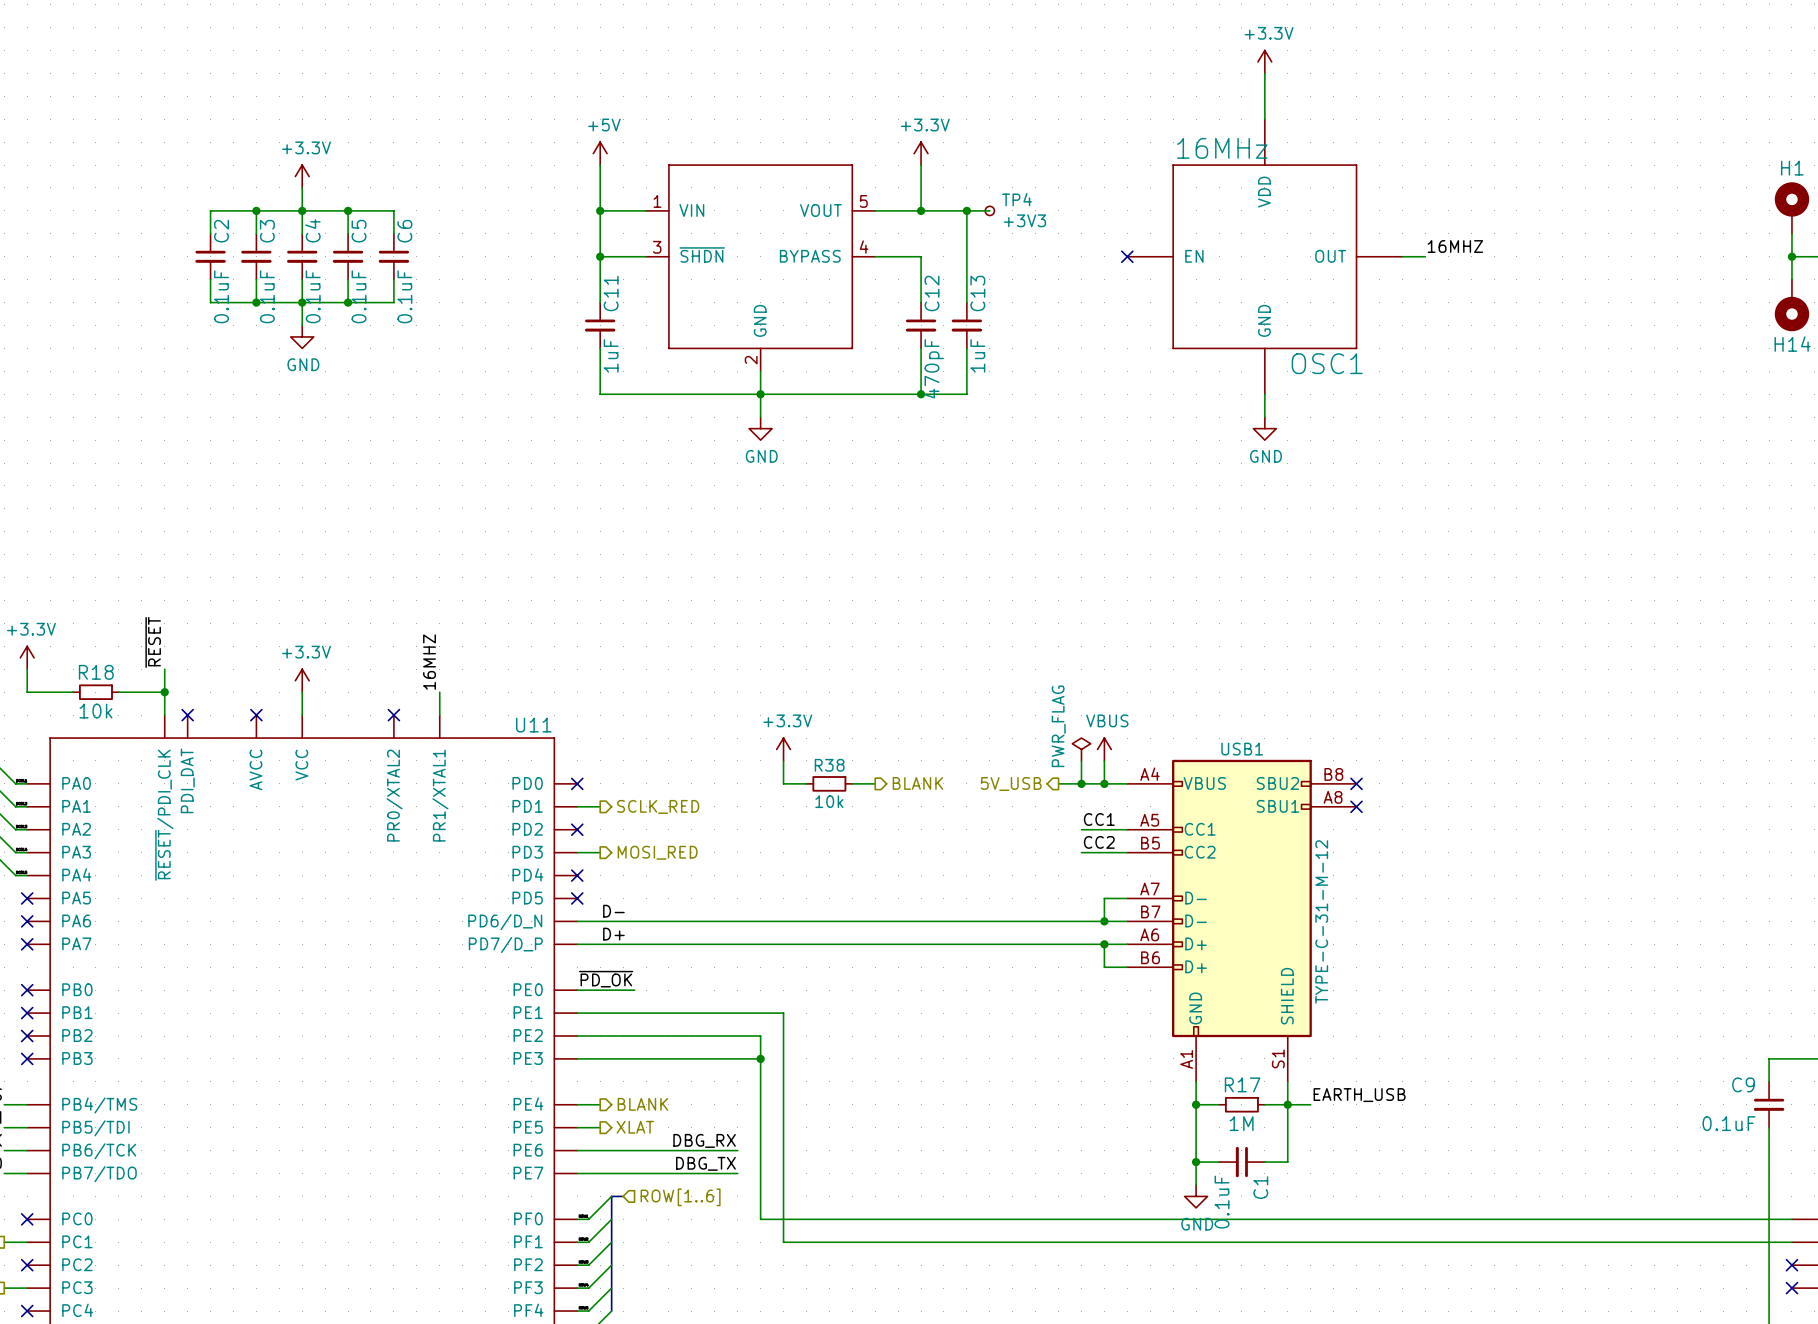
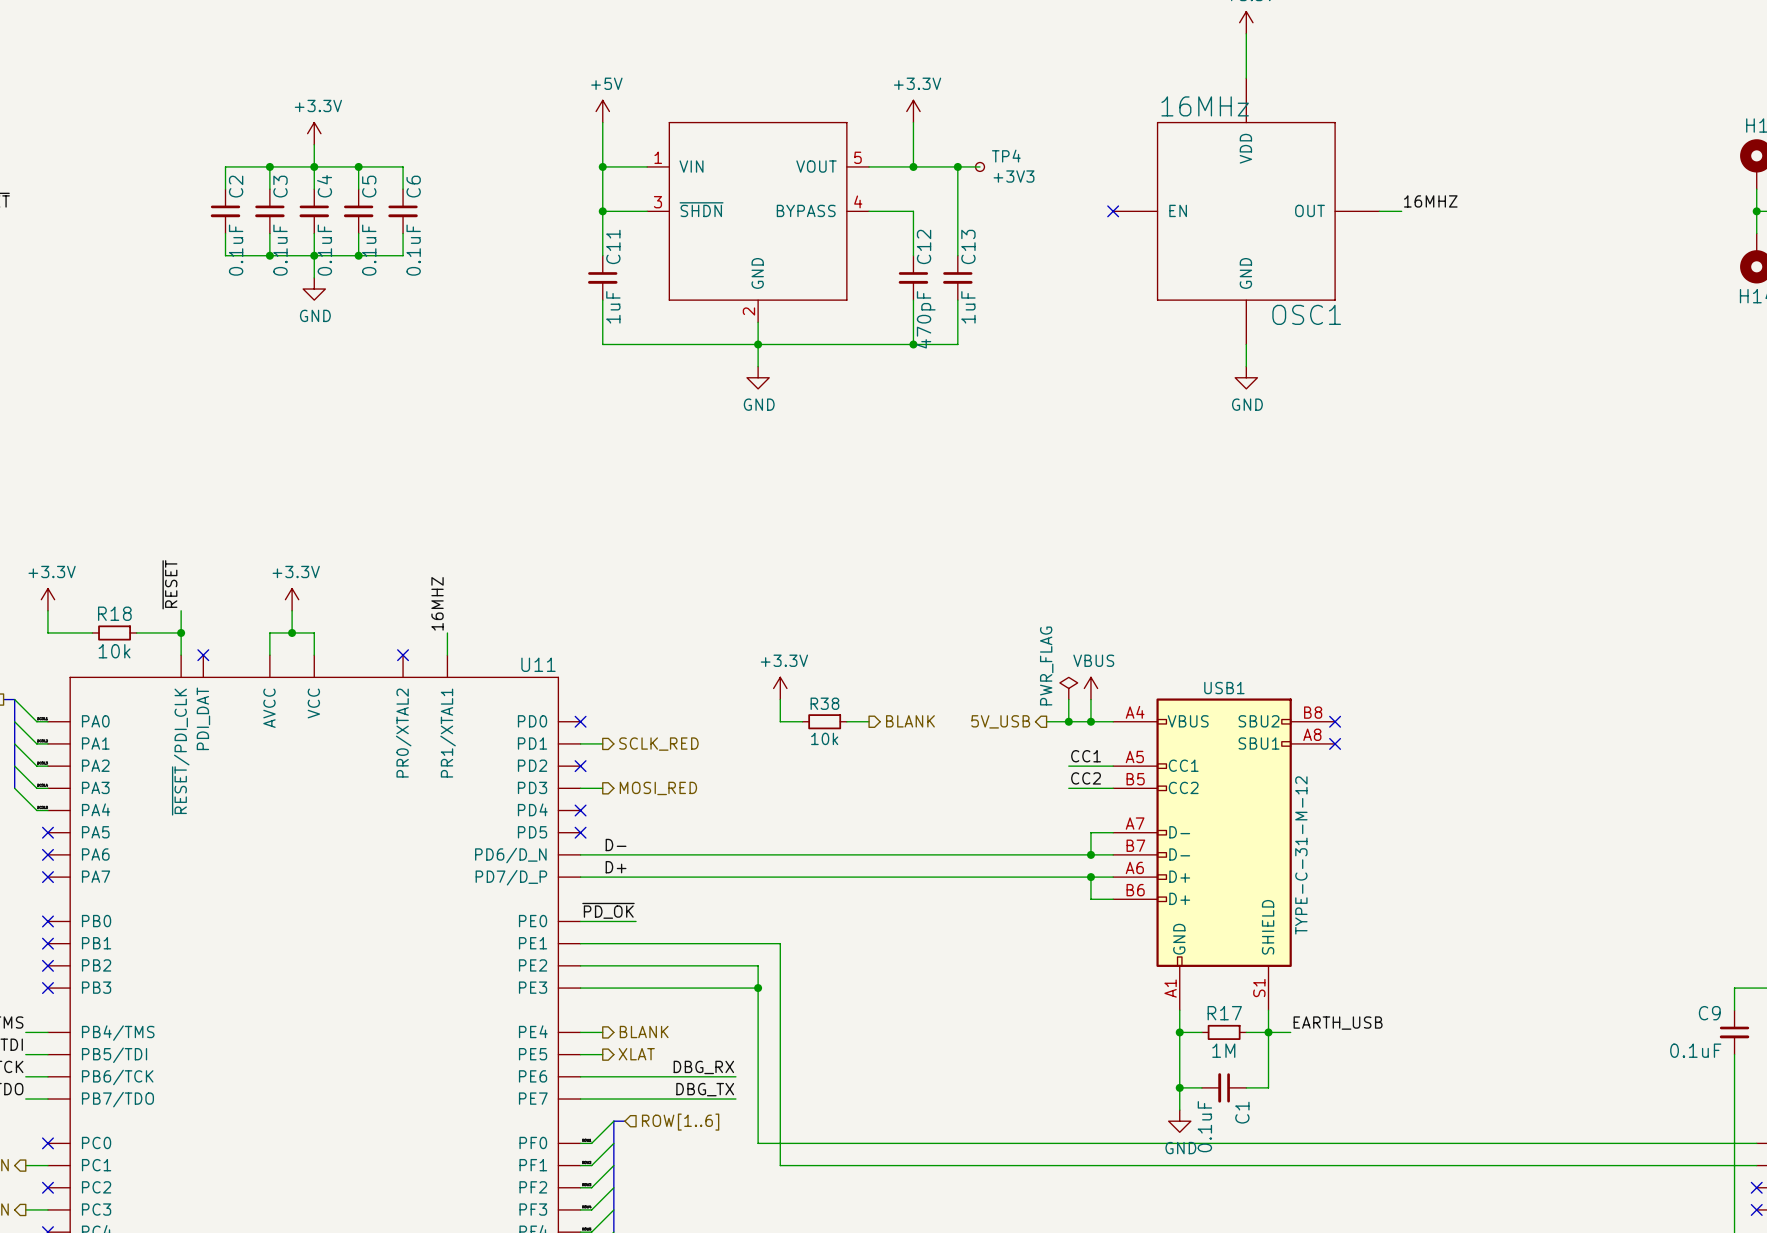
wire: none -> (292, 610) (292, 632)
power symbol position: +3.3V (302, 680) -> +3.3V (292, 599)
junction: none -> (292, 632)
wire: none -> (314, 632) (269, 632) (269, 655)
no-connect mark: (256, 715) -> none

